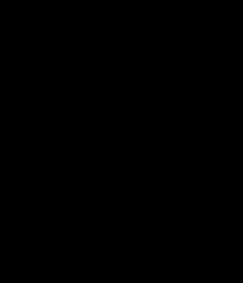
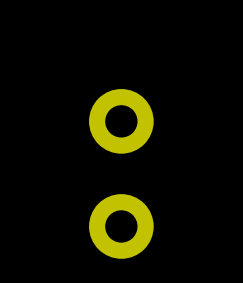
part: none -> (121, 121)
part: none -> (121, 226)

